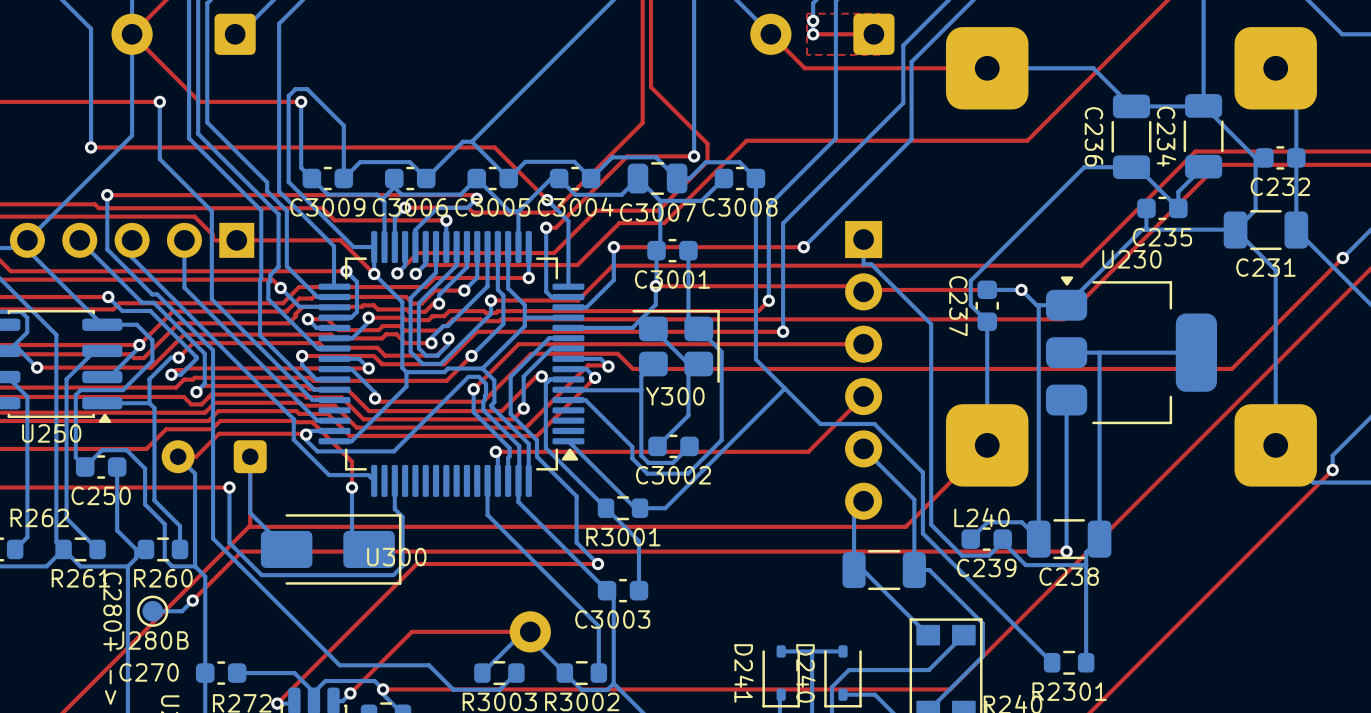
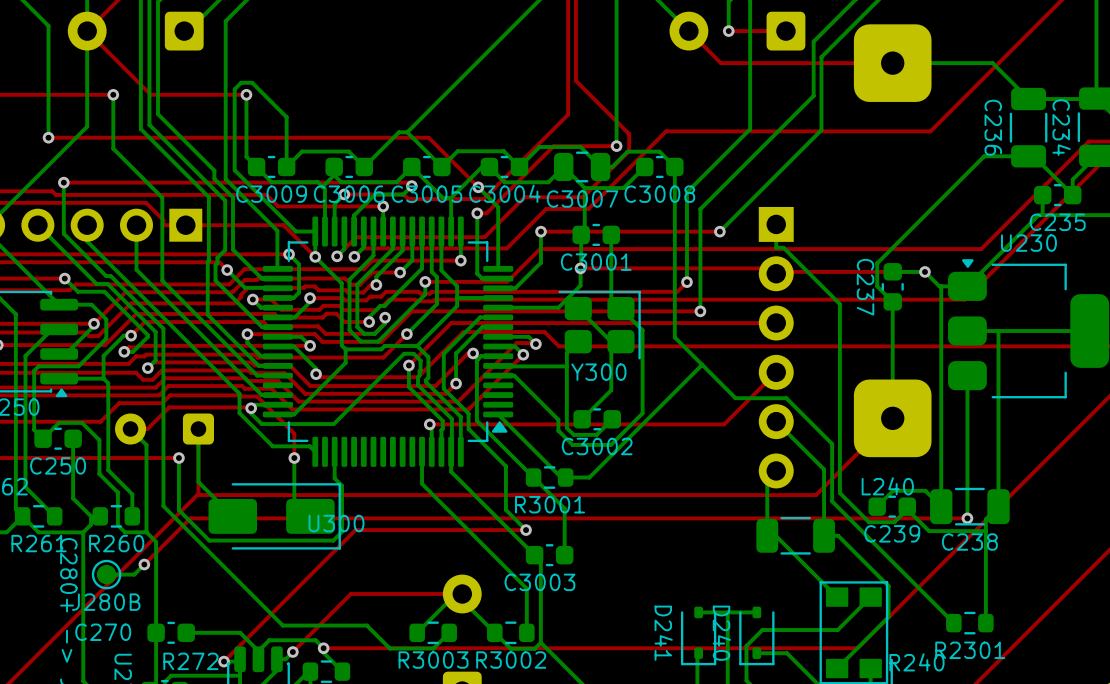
top zone outline: (880, 13) (806, 13) (806, 54) (880, 54) (880, 13) -> none
via: (813, 20) -> none

